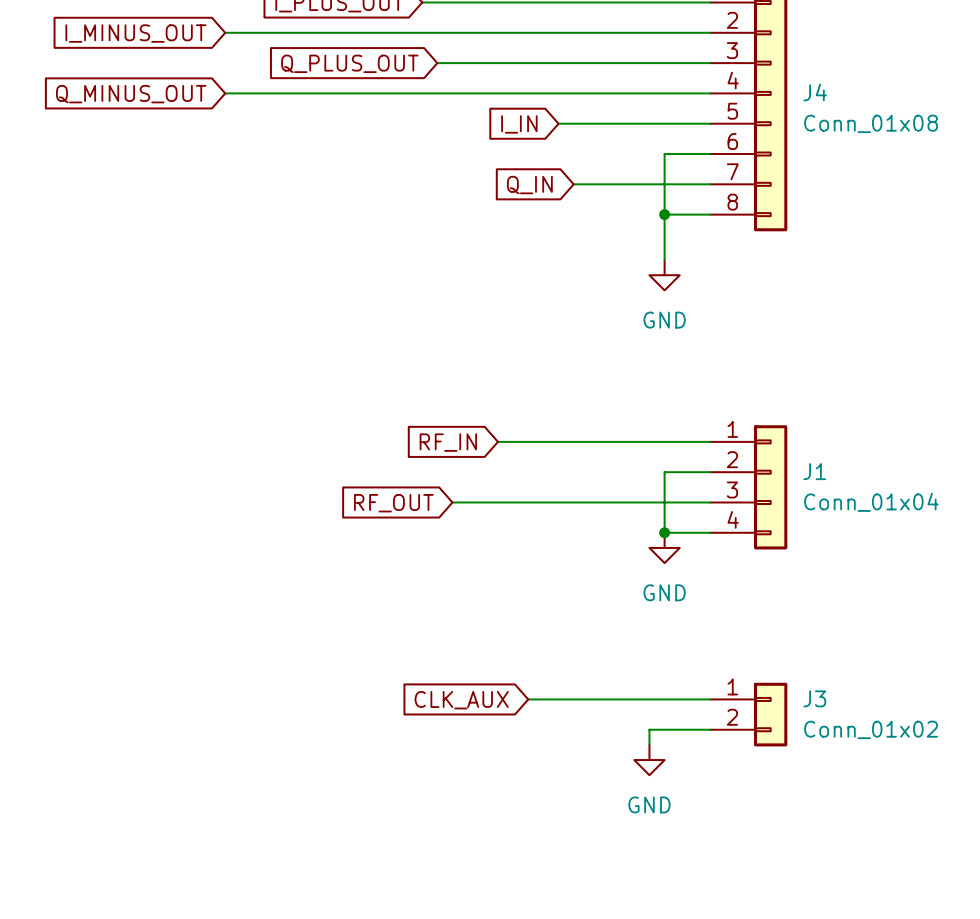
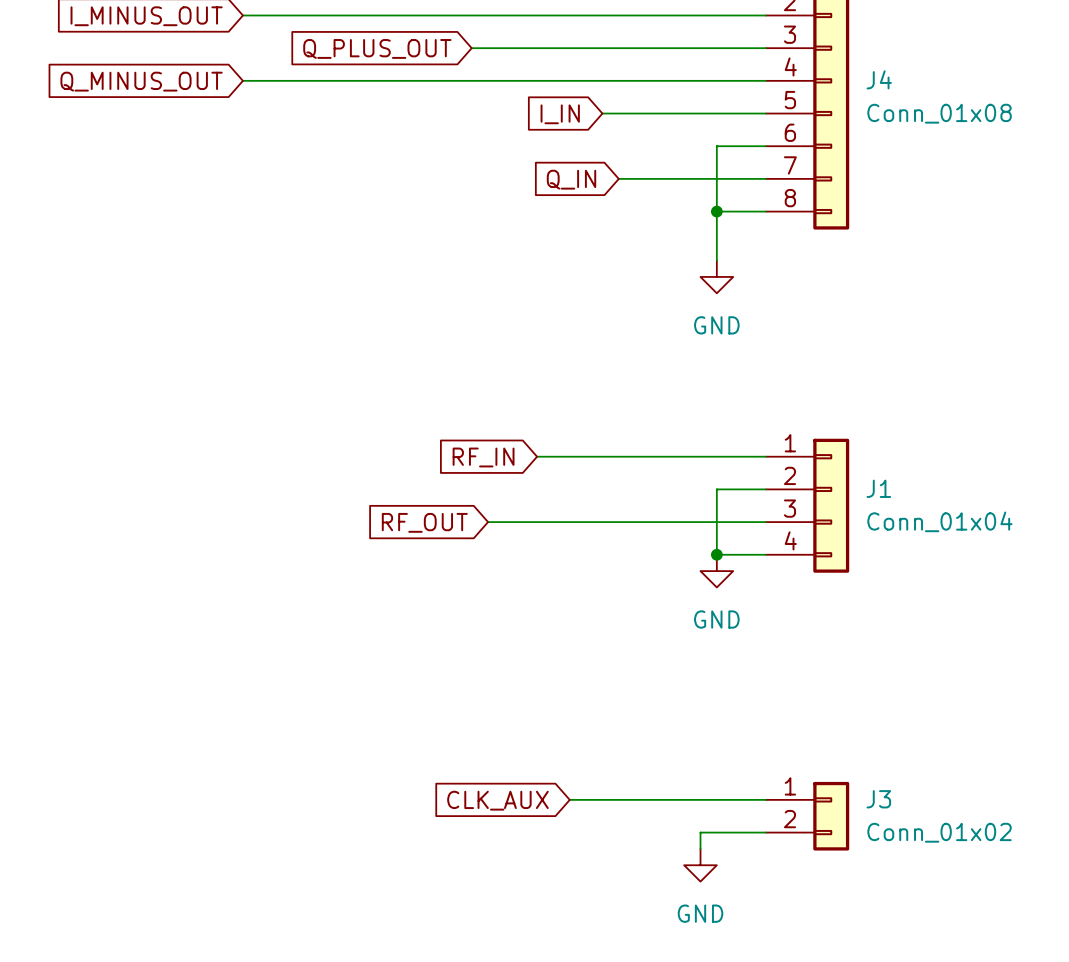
wire: (528, 699) (710, 699) -> (569, 799) (765, 799)
global label position: CLK_AUX (461, 700) -> CLK_AUX (497, 800)
J3 position: (748, 714) -> (807, 816)
wire: (710, 729) (649, 729) (649, 744) -> (765, 832) (700, 832) (700, 848)
power symbol position: GND (649, 760) -> GND (700, 865)

